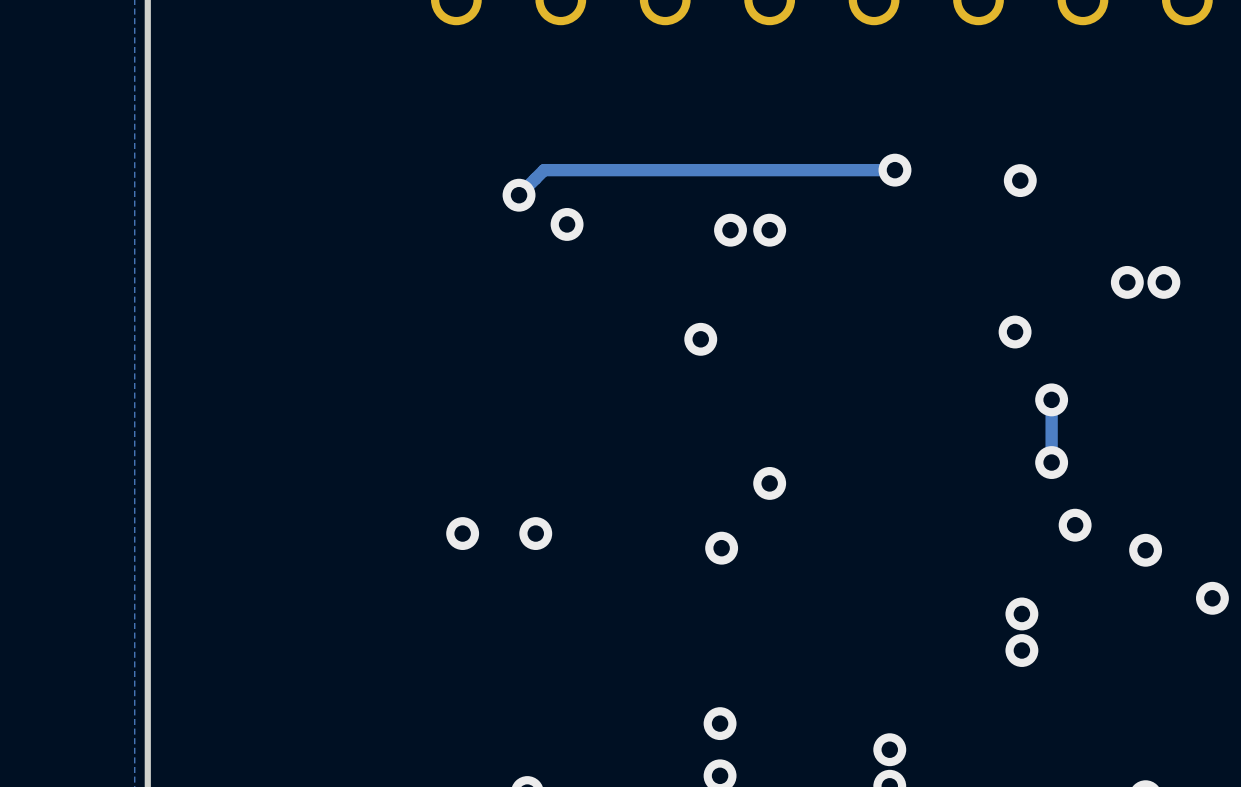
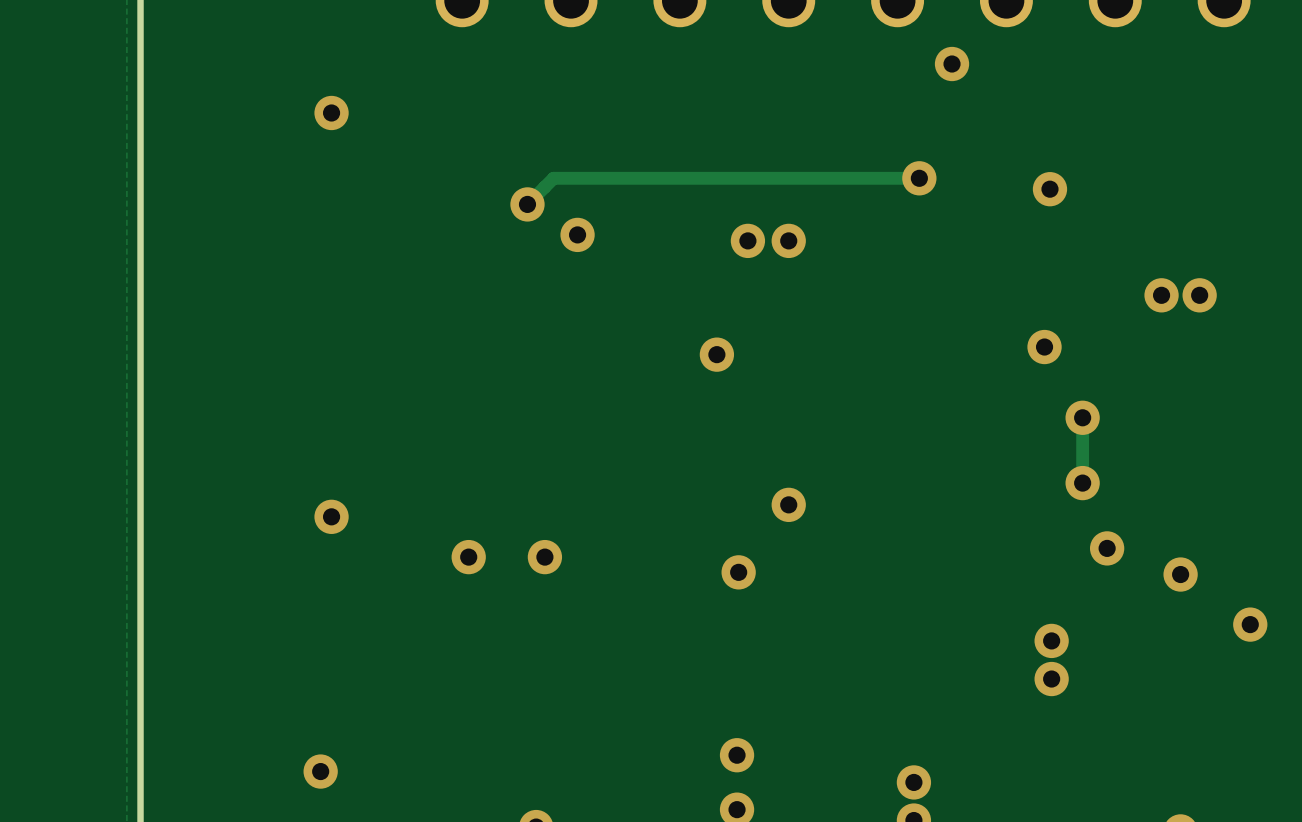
via: none -> (952, 64)
via: none -> (331, 112)
via: none -> (331, 516)
via: none -> (320, 771)

